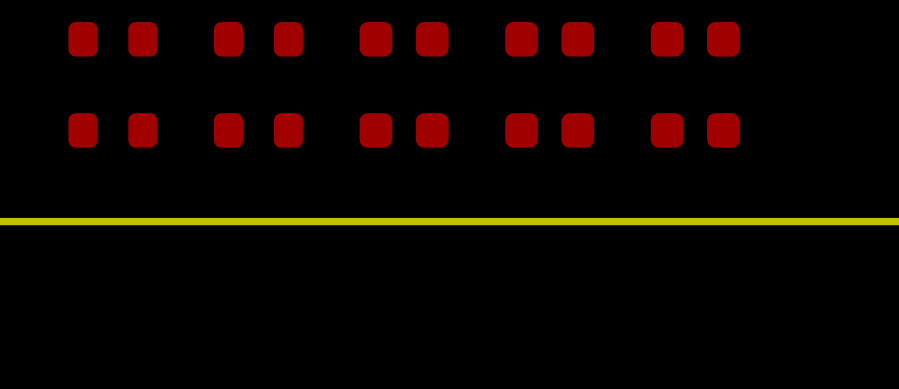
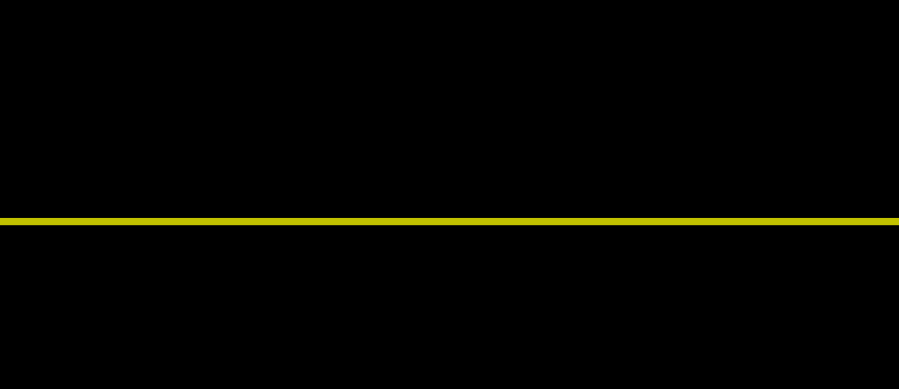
part: (112, 39) -> none
part: (258, 39) -> none
part: (404, 39) -> none
part: (549, 39) -> none
part: (695, 39) -> none
part: (112, 130) -> none
part: (258, 130) -> none
part: (404, 130) -> none
part: (549, 130) -> none
part: (695, 130) -> none

